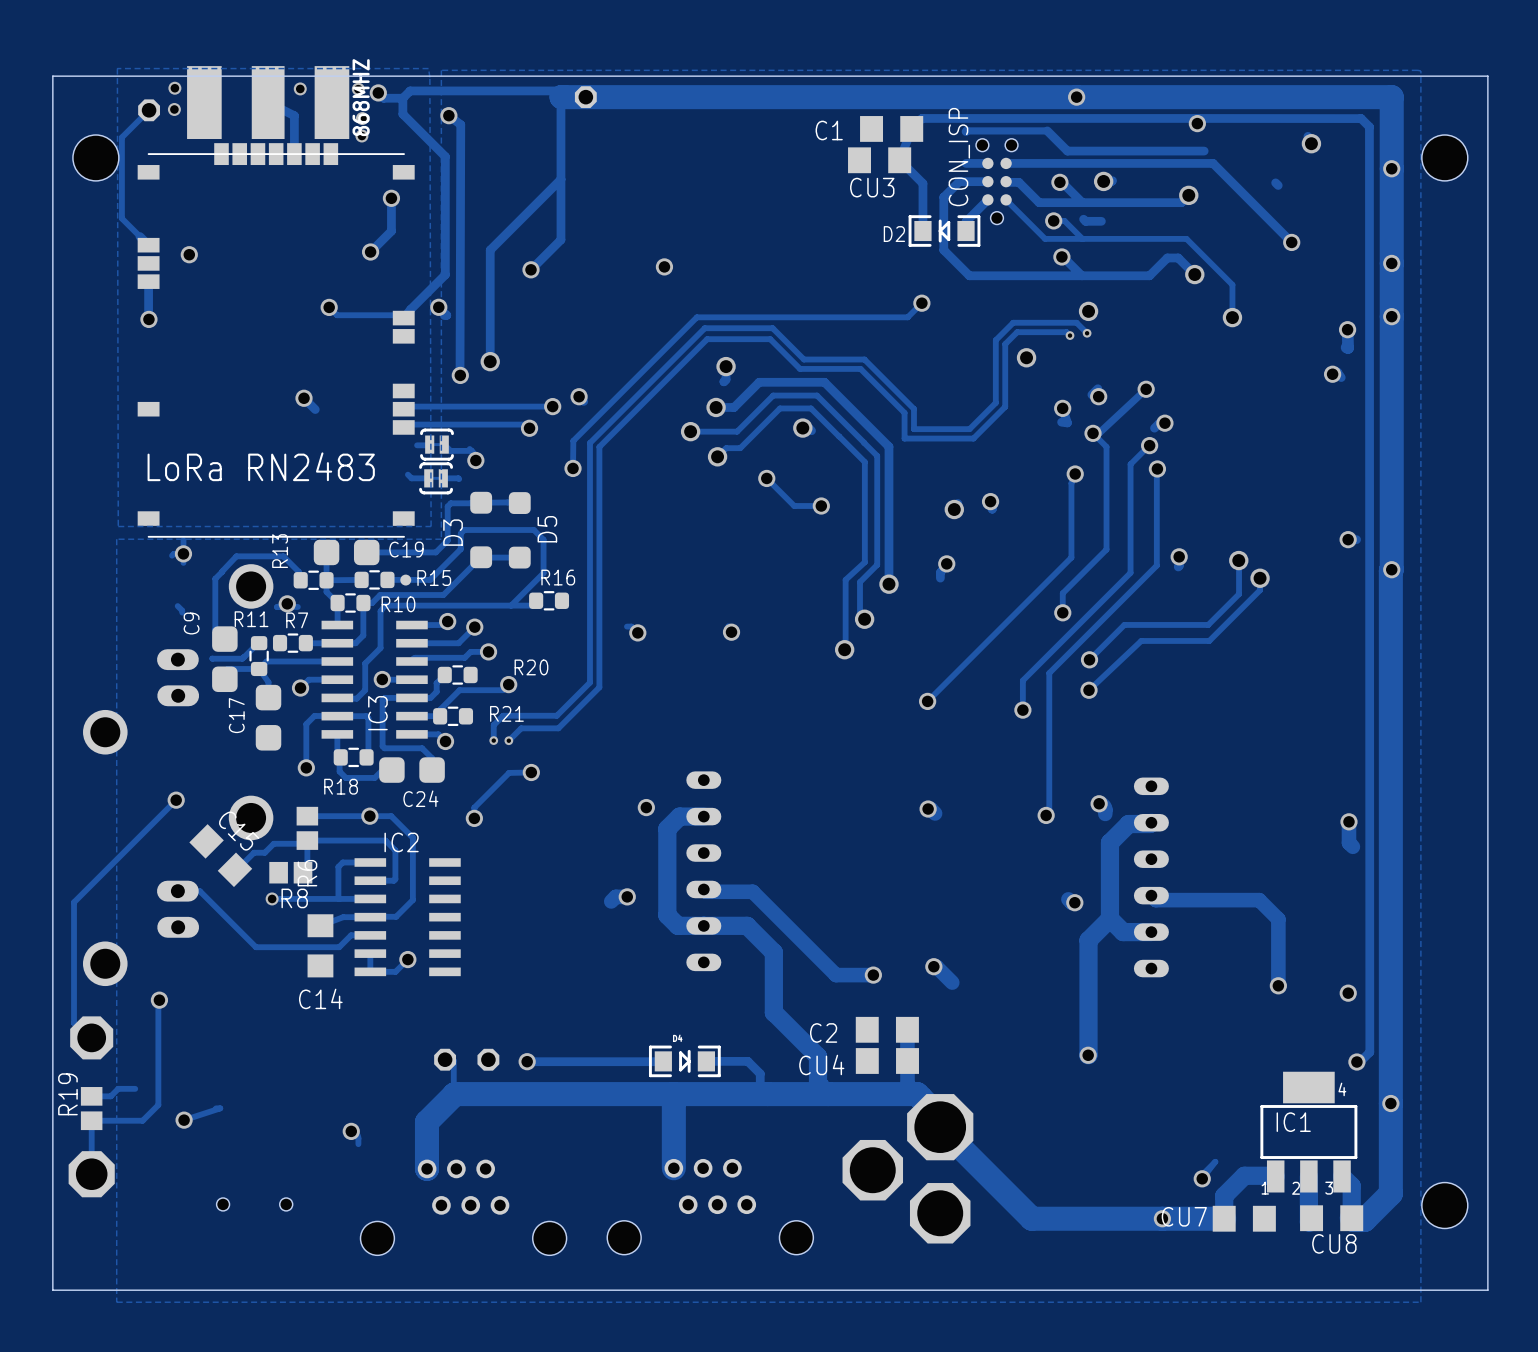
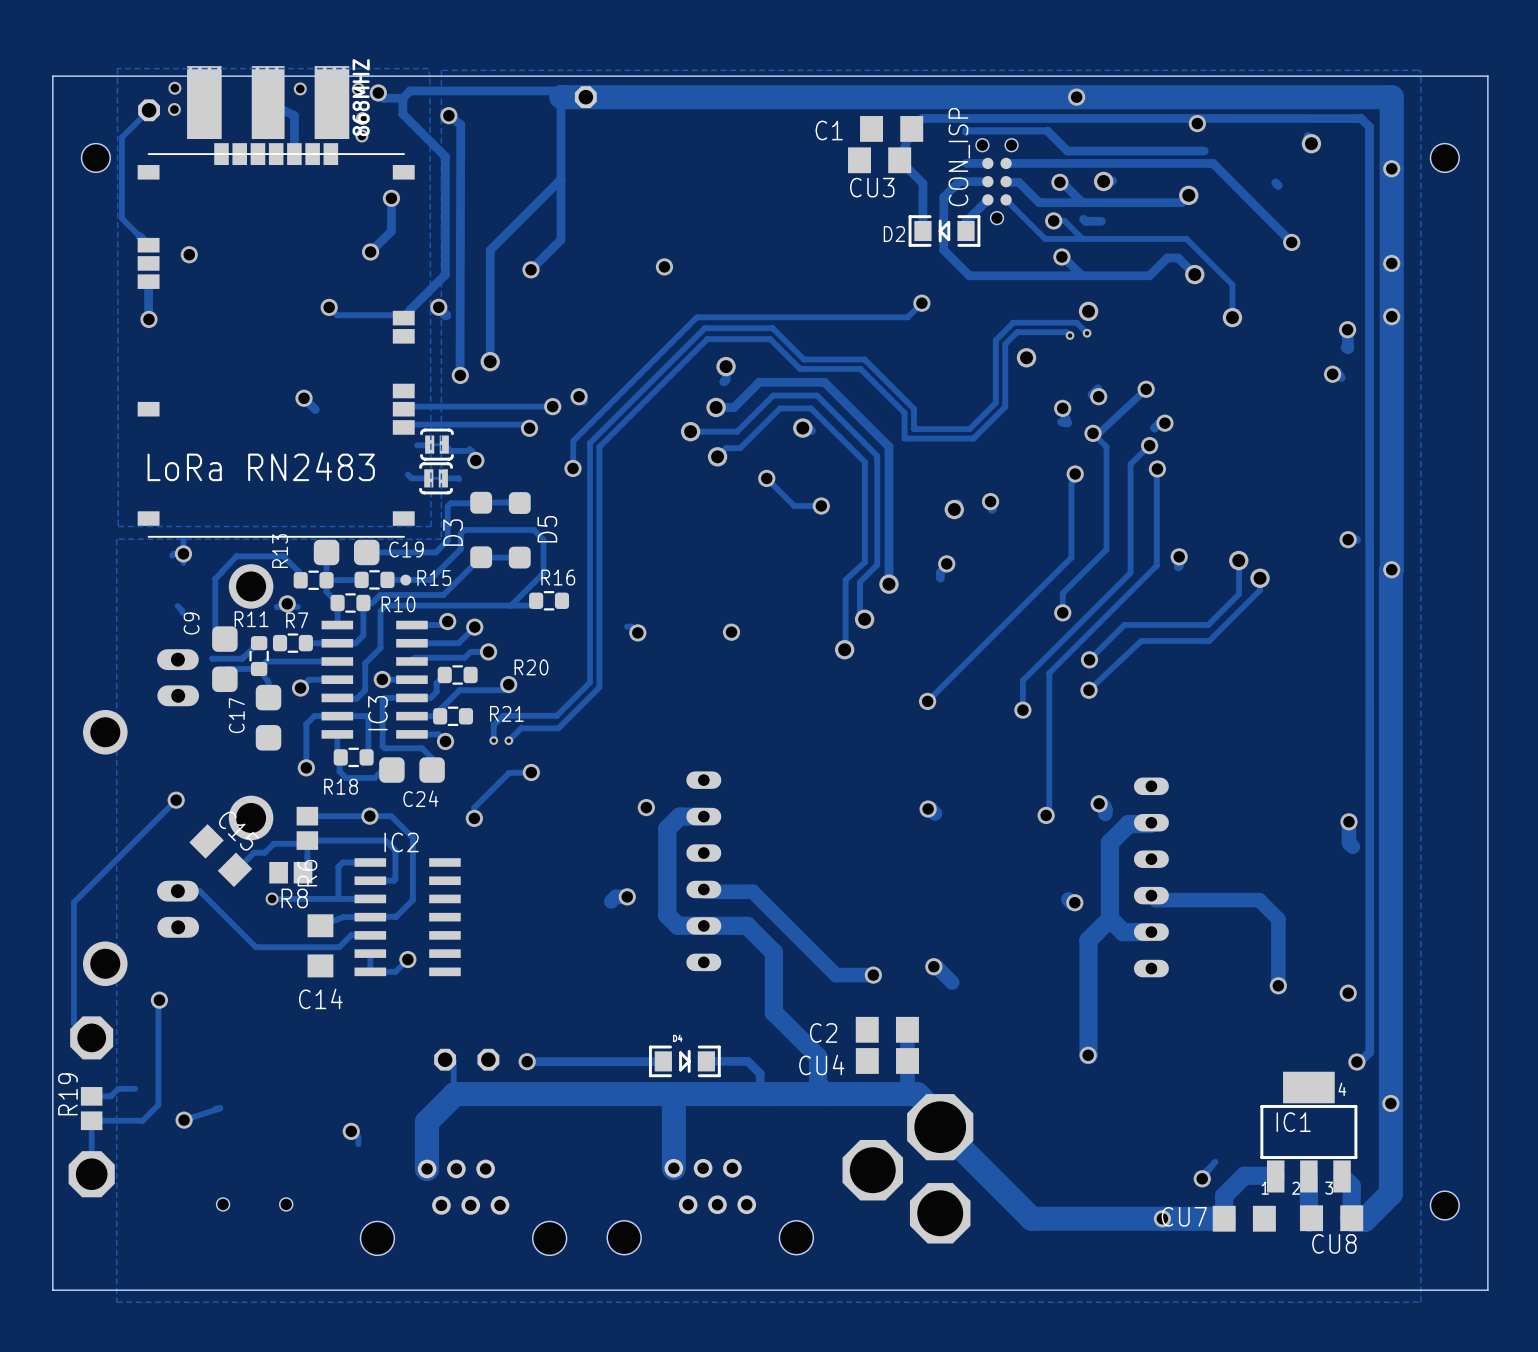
hole size: [72, 134, 119, 181] -> [81, 143, 111, 173]
hole size: [1421, 134, 1468, 181] -> [1430, 143, 1460, 173]
hole size: [1421, 1182, 1468, 1229] -> [1430, 1191, 1460, 1220]

